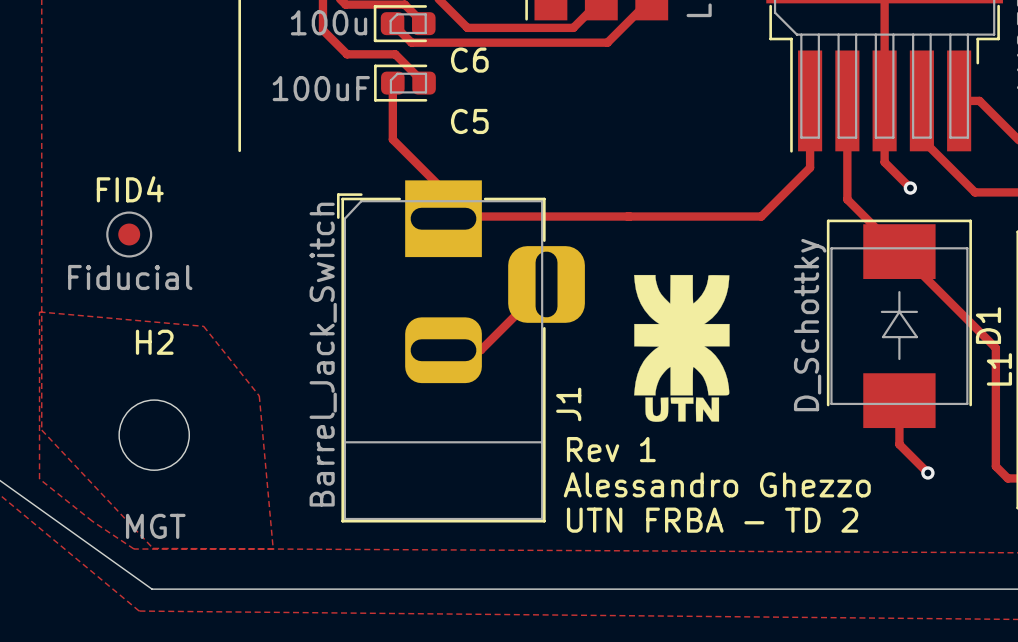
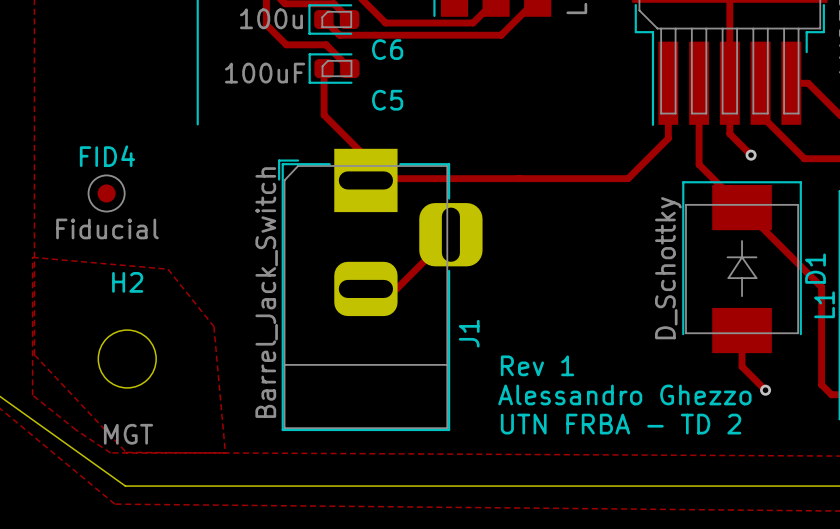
drawing: [634, 274, 730, 422] -> none
text position: Rev 1 (611, 449) -> Rev 1 (537, 365)
text position: Alessandro Ghezzo (717, 484) -> Alessandro Ghezzo (624, 394)
text position: UTN FRBA - TD 2 (712, 520) -> UTN FRBA - TD 2 (621, 424)

